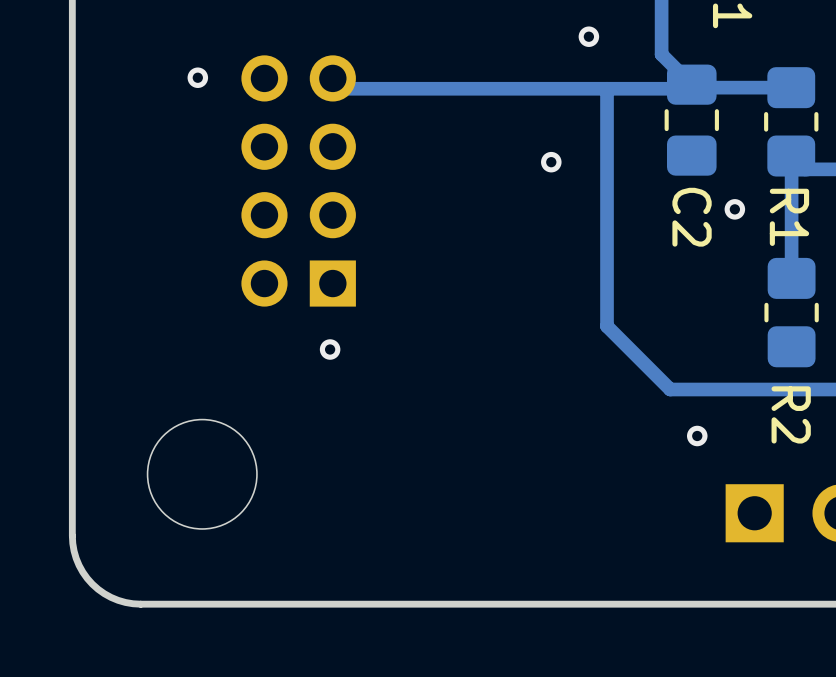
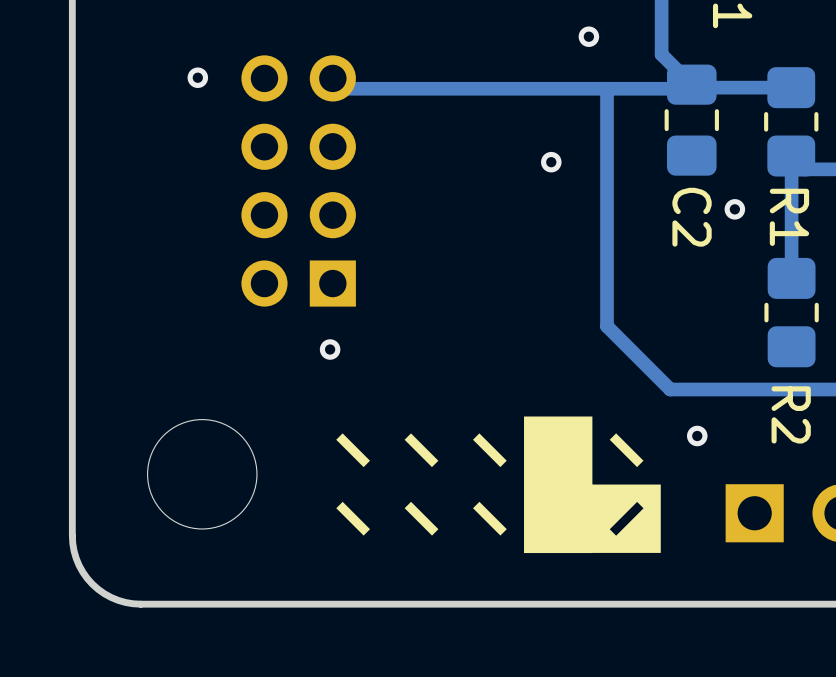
drawing: none -> [336, 416, 661, 554]

